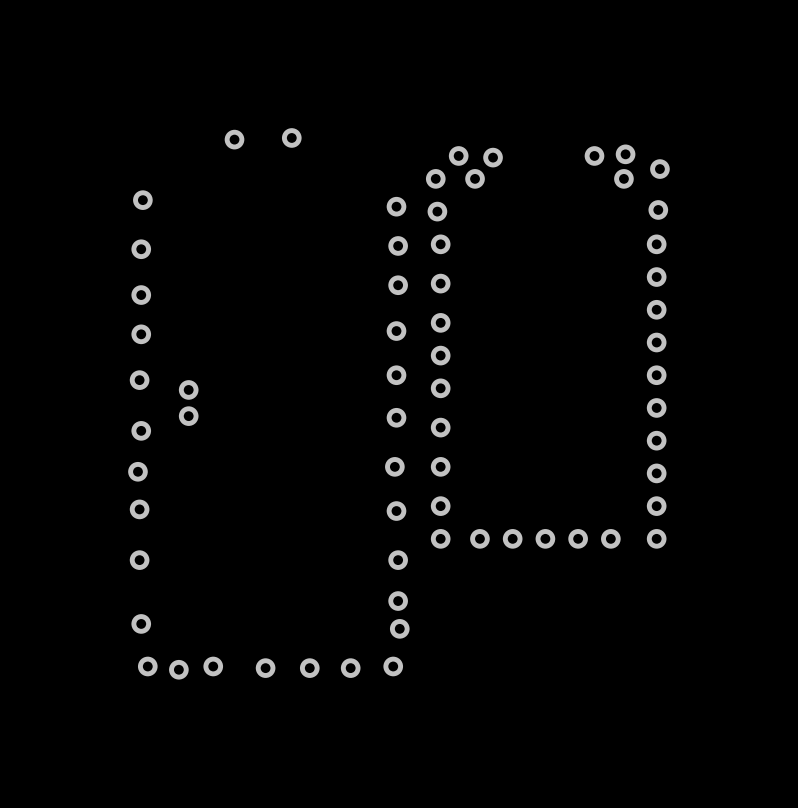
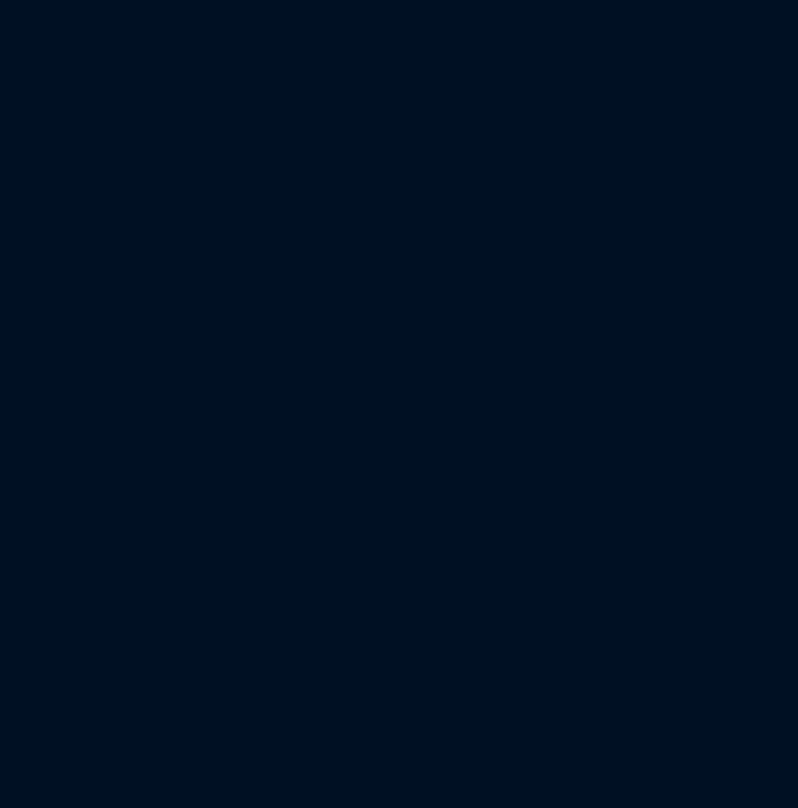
via: (291, 137) -> none
via: (234, 139) -> none
via: (625, 154) -> none
via: (458, 155) -> none
via: (594, 155) -> none
via: (493, 157) -> none
via: (659, 169) -> none
via: (435, 178) -> none
via: (475, 178) -> none
via: (623, 178) -> none
via: (142, 200) -> none
via: (396, 206) -> none
via: (658, 209) -> none
via: (437, 211) -> none
via: (440, 244) -> none
via: (656, 244) -> none
via: (398, 245) -> none
via: (141, 249) -> none
via: (656, 277) -> none
via: (440, 283) -> none
via: (398, 285) -> none
via: (141, 295) -> none
via: (656, 309) -> none
via: (440, 322) -> none
via: (396, 331) -> none
via: (141, 334) -> none
via: (656, 342) -> none
via: (440, 355) -> none
via: (396, 375) -> none
via: (656, 375) -> none
via: (139, 380) -> none
via: (440, 388) -> none
via: (188, 389) -> none
via: (656, 407) -> none
via: (188, 416) -> none
via: (396, 417) -> none
via: (440, 427) -> none
via: (141, 430) -> none
via: (656, 440) -> none
via: (394, 466) -> none
via: (440, 466) -> none
via: (137, 471) -> none
via: (656, 473) -> none
via: (440, 506) -> none
via: (656, 506) -> none
via: (139, 509) -> none
via: (396, 511) -> none
via: (440, 538) -> none
via: (479, 538) -> none
via: (512, 538) -> none
via: (545, 538) -> none
via: (578, 538) -> none
via: (610, 538) -> none
via: (656, 538) -> none
via: (139, 560) -> none
via: (398, 560) -> none
via: (398, 601) -> none
via: (141, 623) -> none
via: (399, 628) -> none
via: (147, 666) -> none
via: (213, 666) -> none
via: (393, 666) -> none
via: (265, 668) -> none
via: (309, 668) -> none
via: (350, 668) -> none
via: (178, 669) -> none

